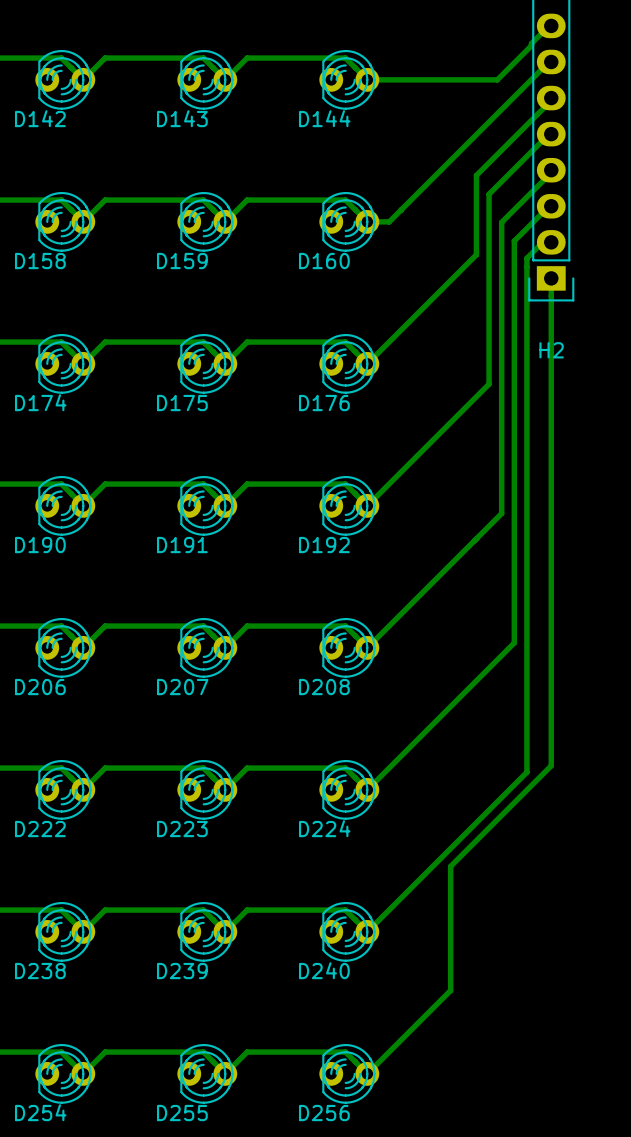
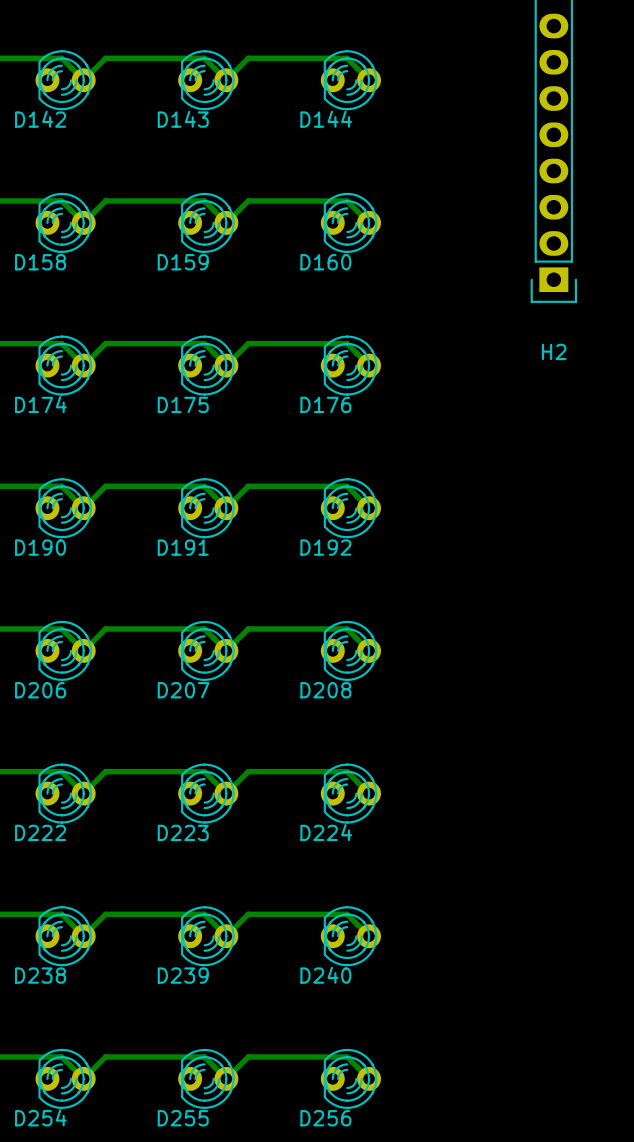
track: (549, 25) (497, 79) (367, 79) -> none
track: (549, 61) (389, 221) (367, 221) -> none
track: (551, 100) (476, 175) (476, 254) (367, 363) -> none
track: (549, 134) (489, 194) (489, 384) (367, 505) -> none
track: (551, 172) (501, 222) (501, 513) (367, 647) -> none
track: (549, 206) (514, 241) (514, 642) (367, 789) -> none
track: (542, 242) (526, 258) (526, 772) (367, 931) -> none
track: (551, 278) (551, 765) (450, 866) (450, 990) (367, 1073) -> none

